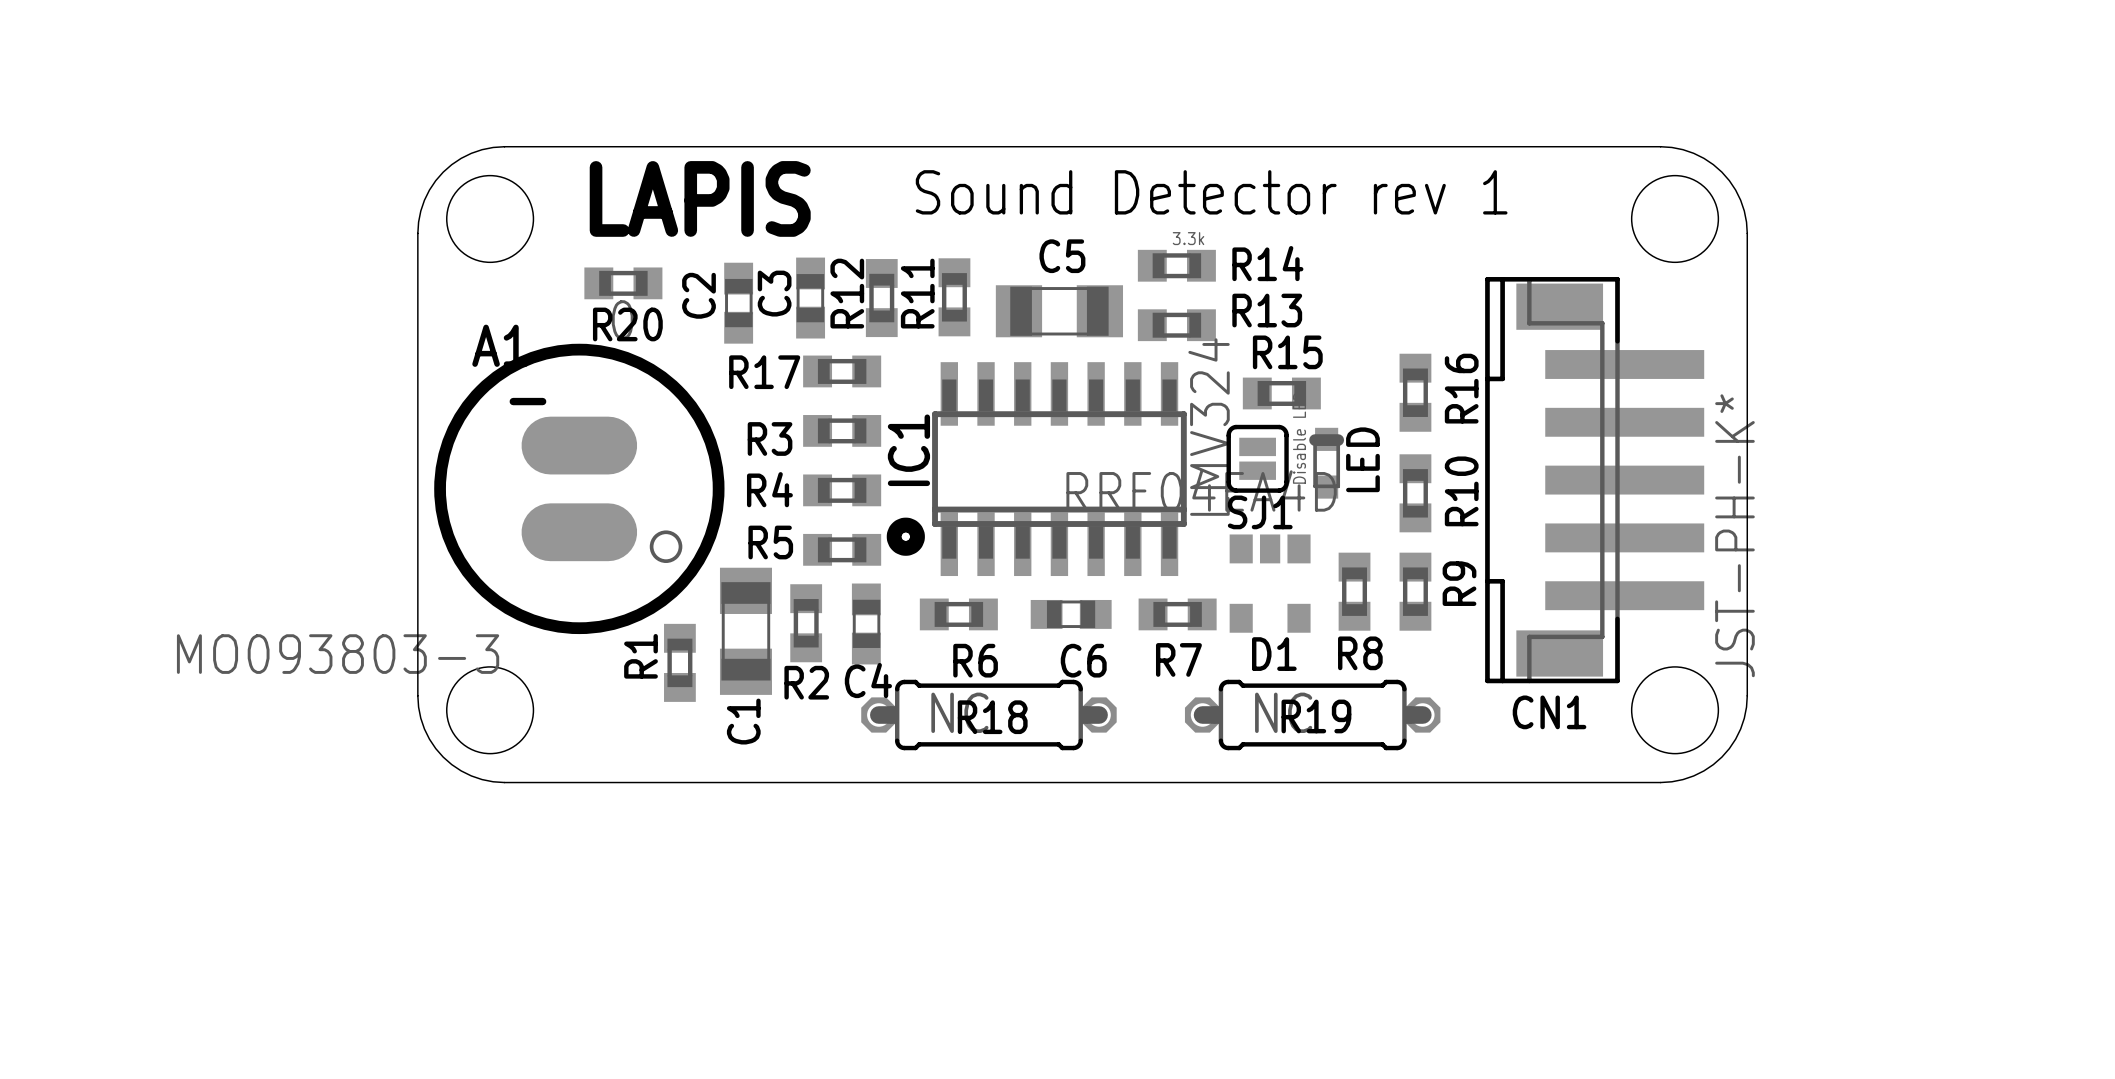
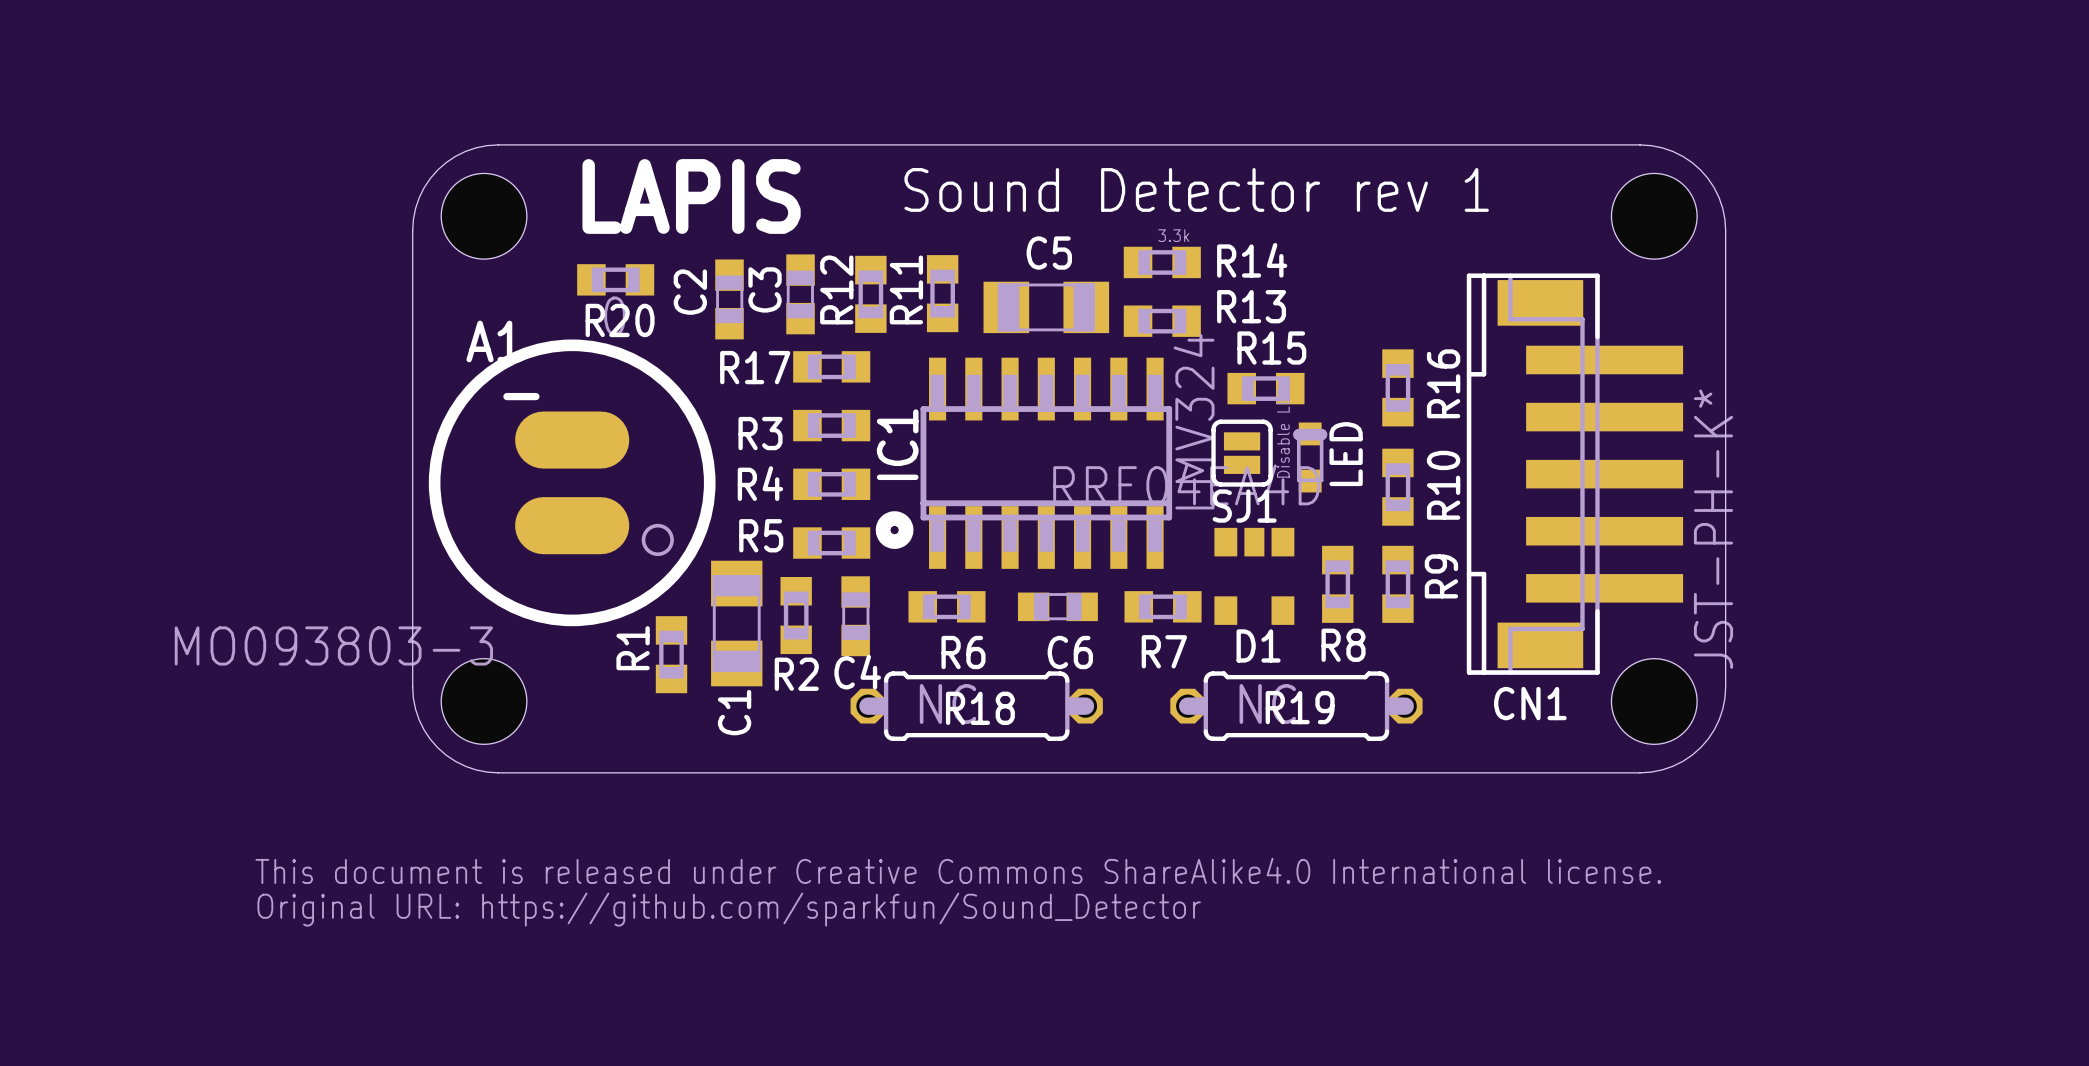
text: none -> This document is released under Creative Commons ShareAlike4.0 International license. (958, 870)
text: none -> Original URL: https://github.com/sparkfun/Sound_Detector (729, 909)

